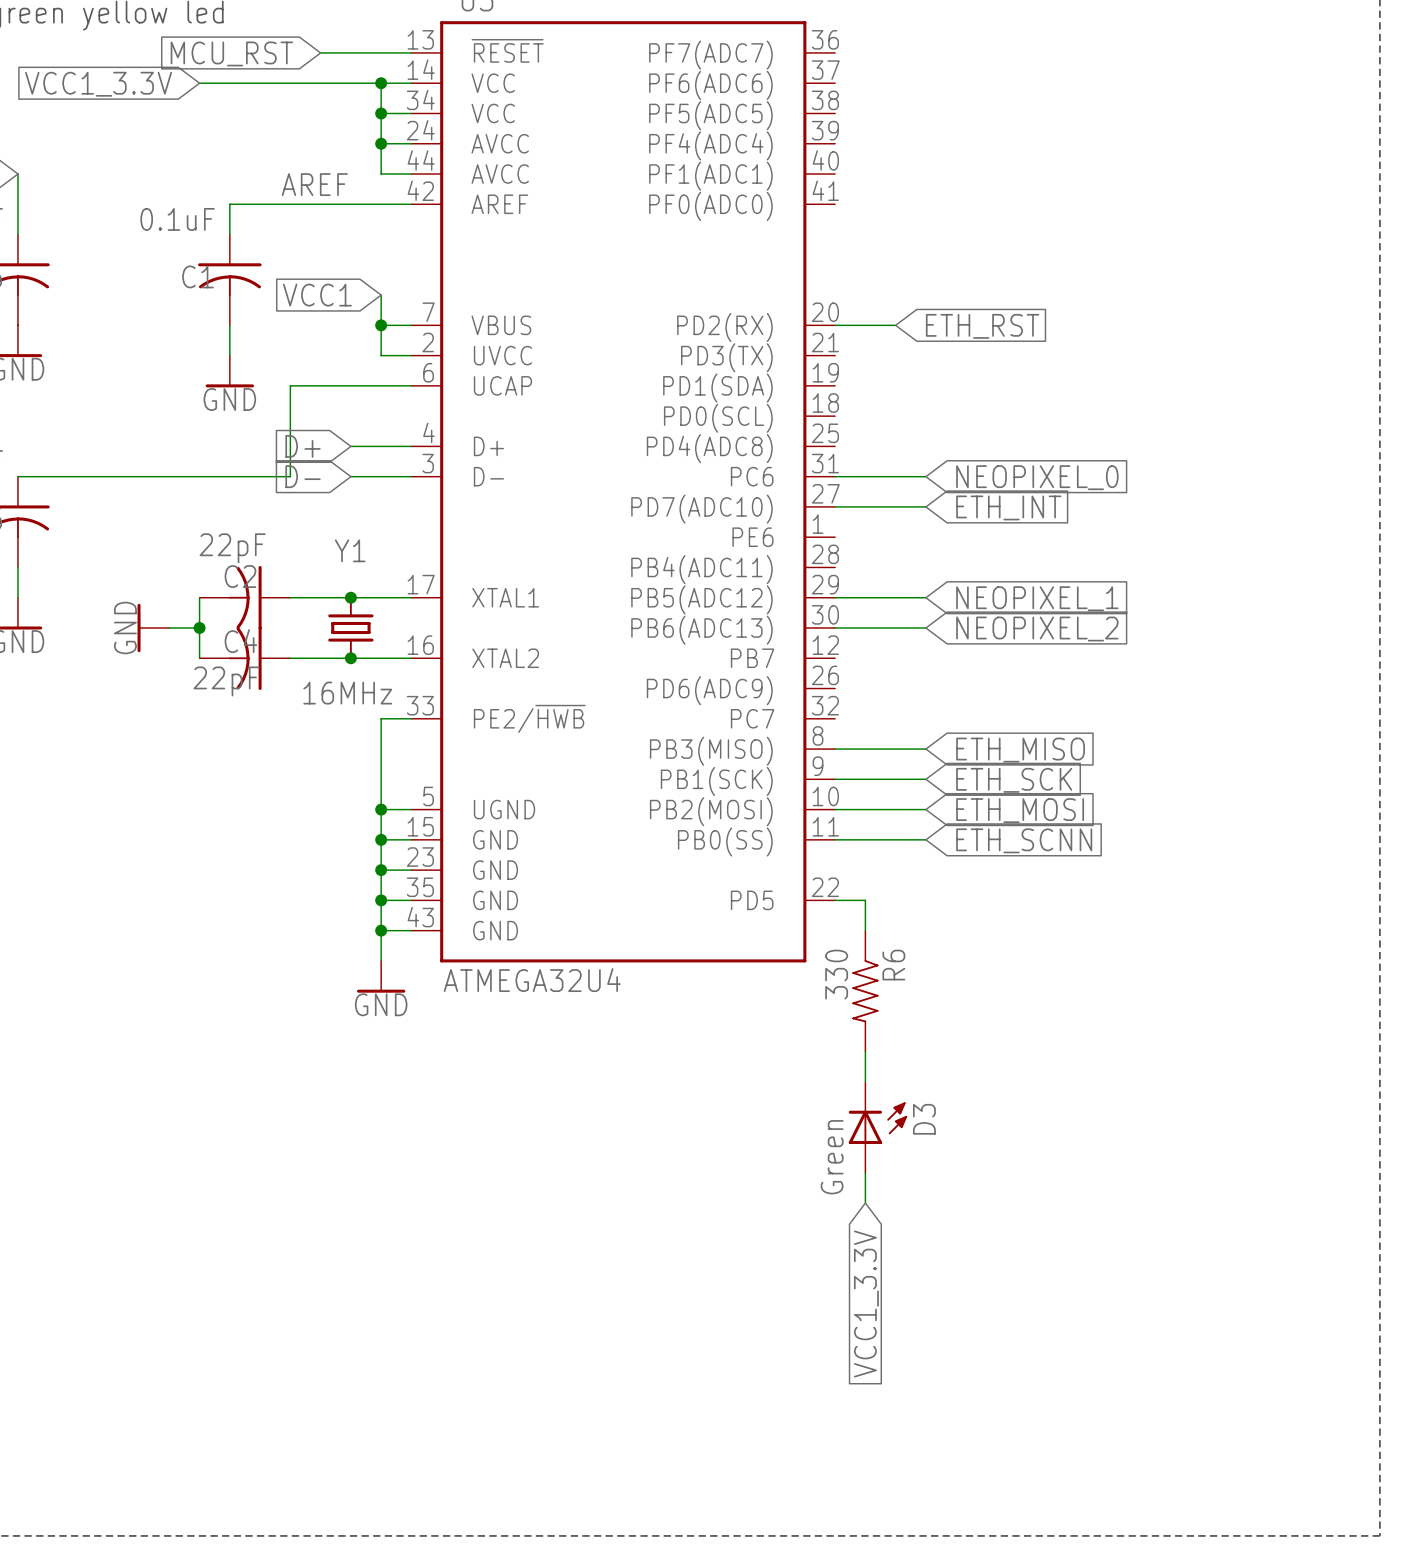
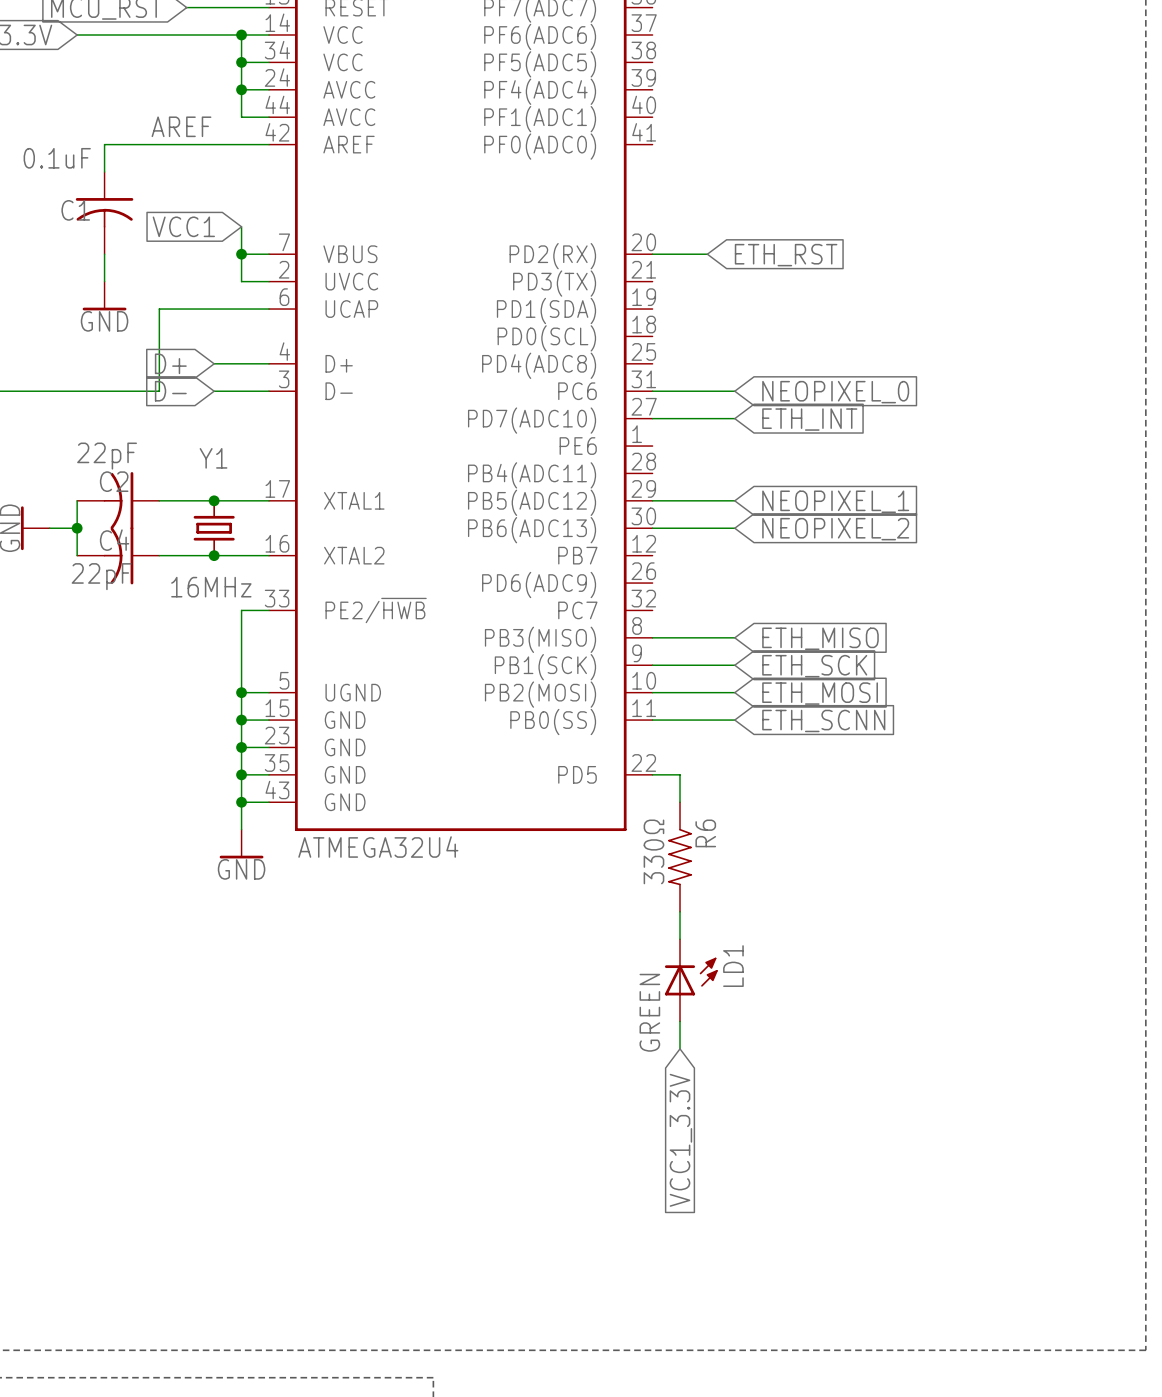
R6 value: 330 (836, 974) -> 330Ω (653, 851)
D3 name: D3 (924, 1119) -> LD1 (733, 966)
D3 value: Green (832, 1157) -> GREEN (649, 1012)

